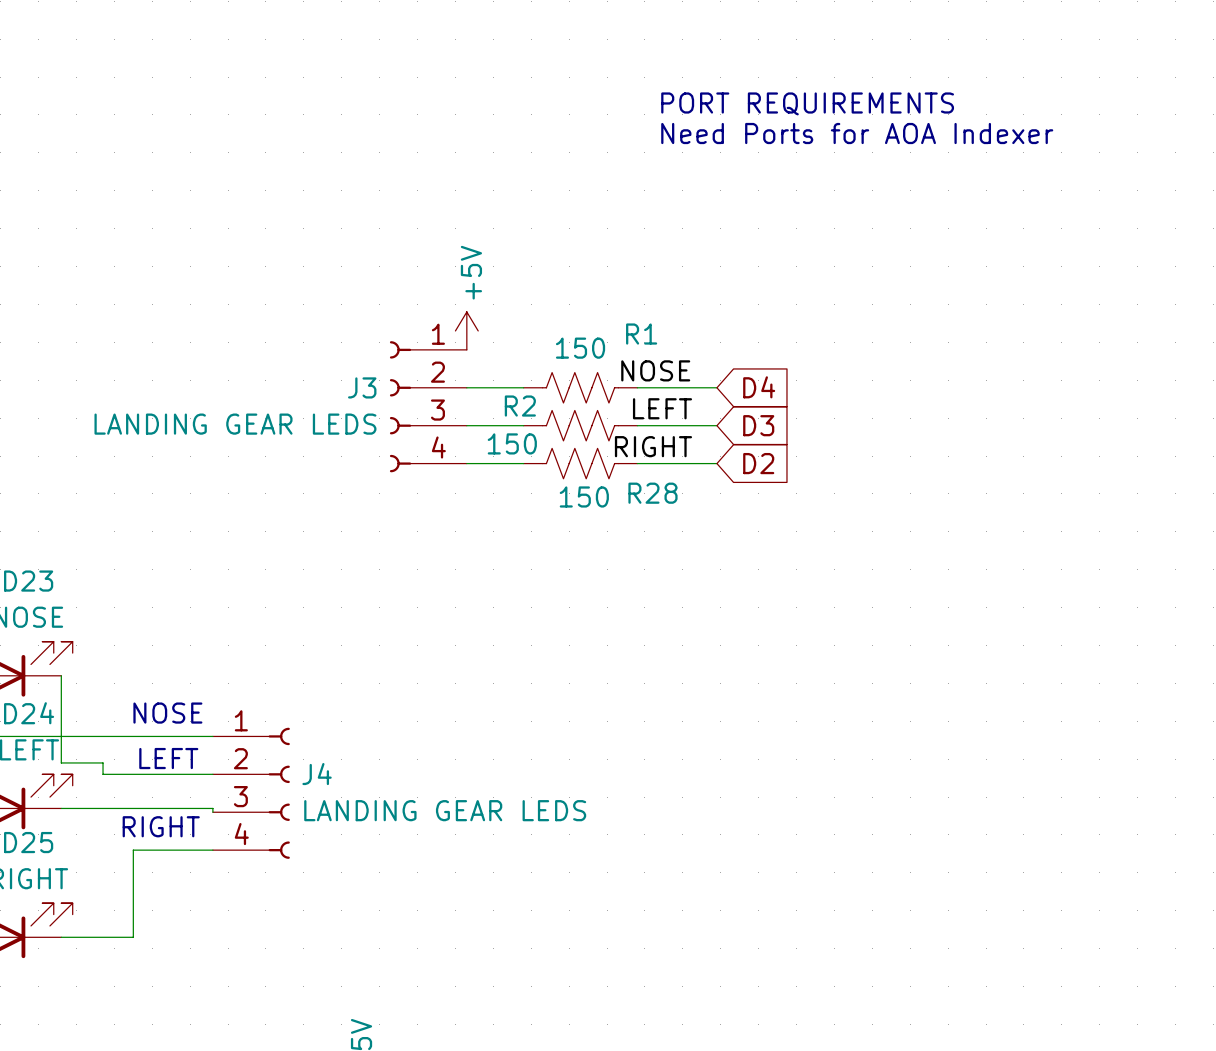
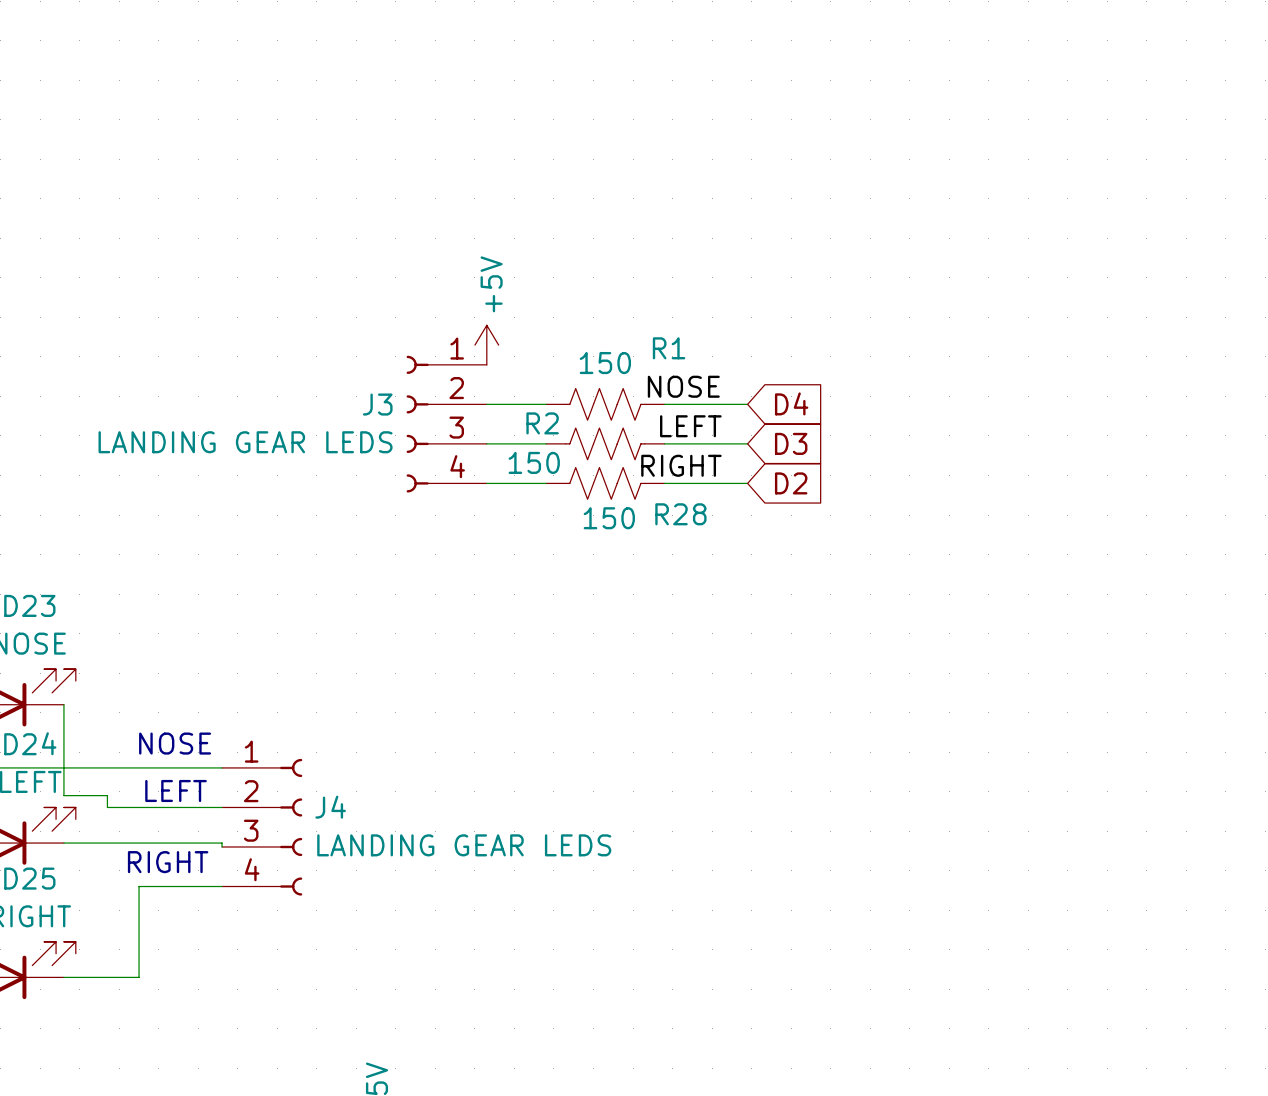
text: PORT REQUIREMENTS (807, 103) -> none
text: Need Ports for AOA Indexer (857, 133) -> none

